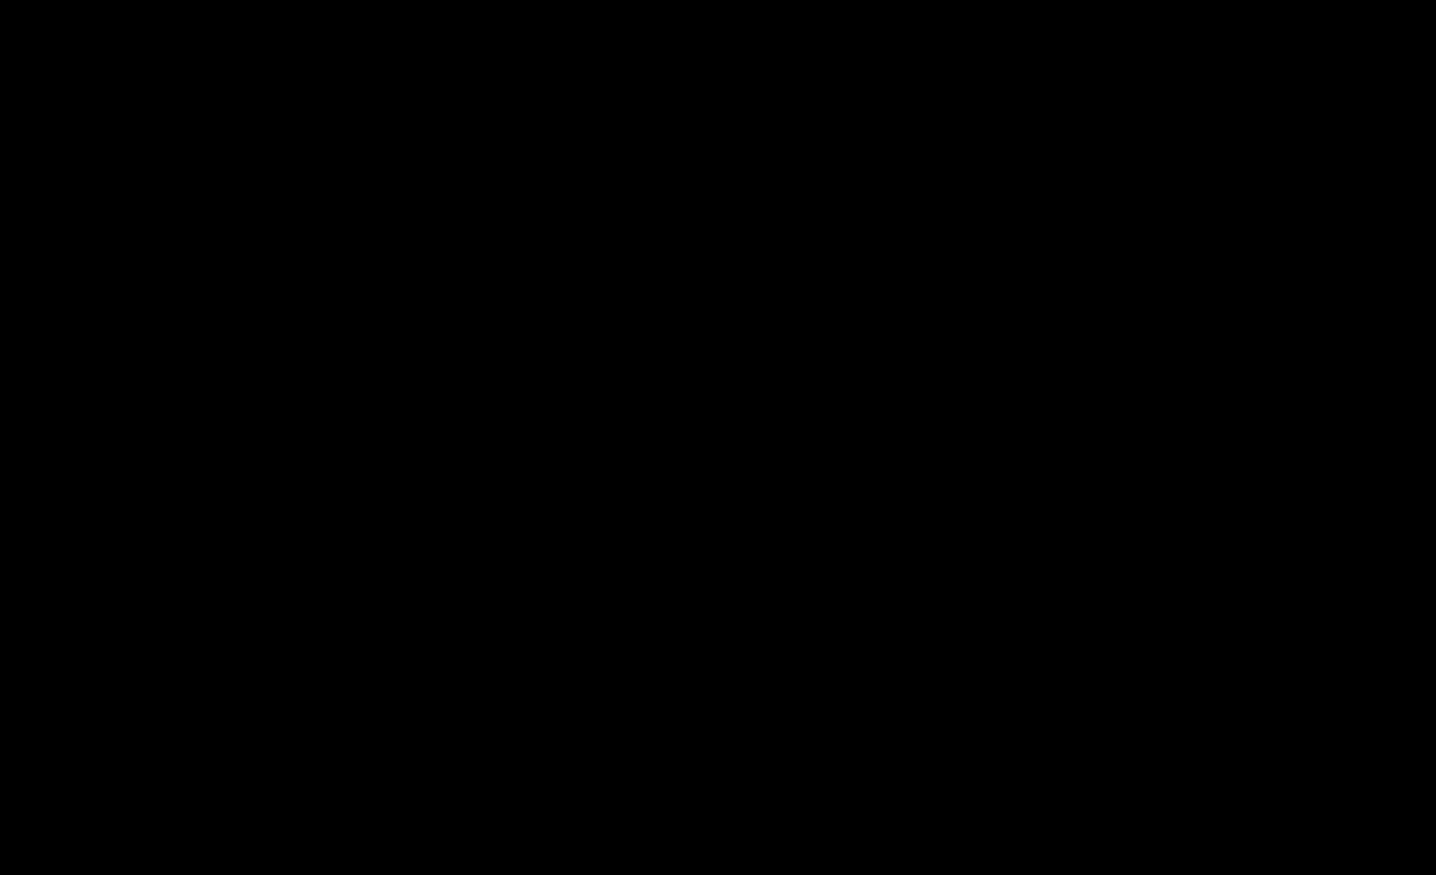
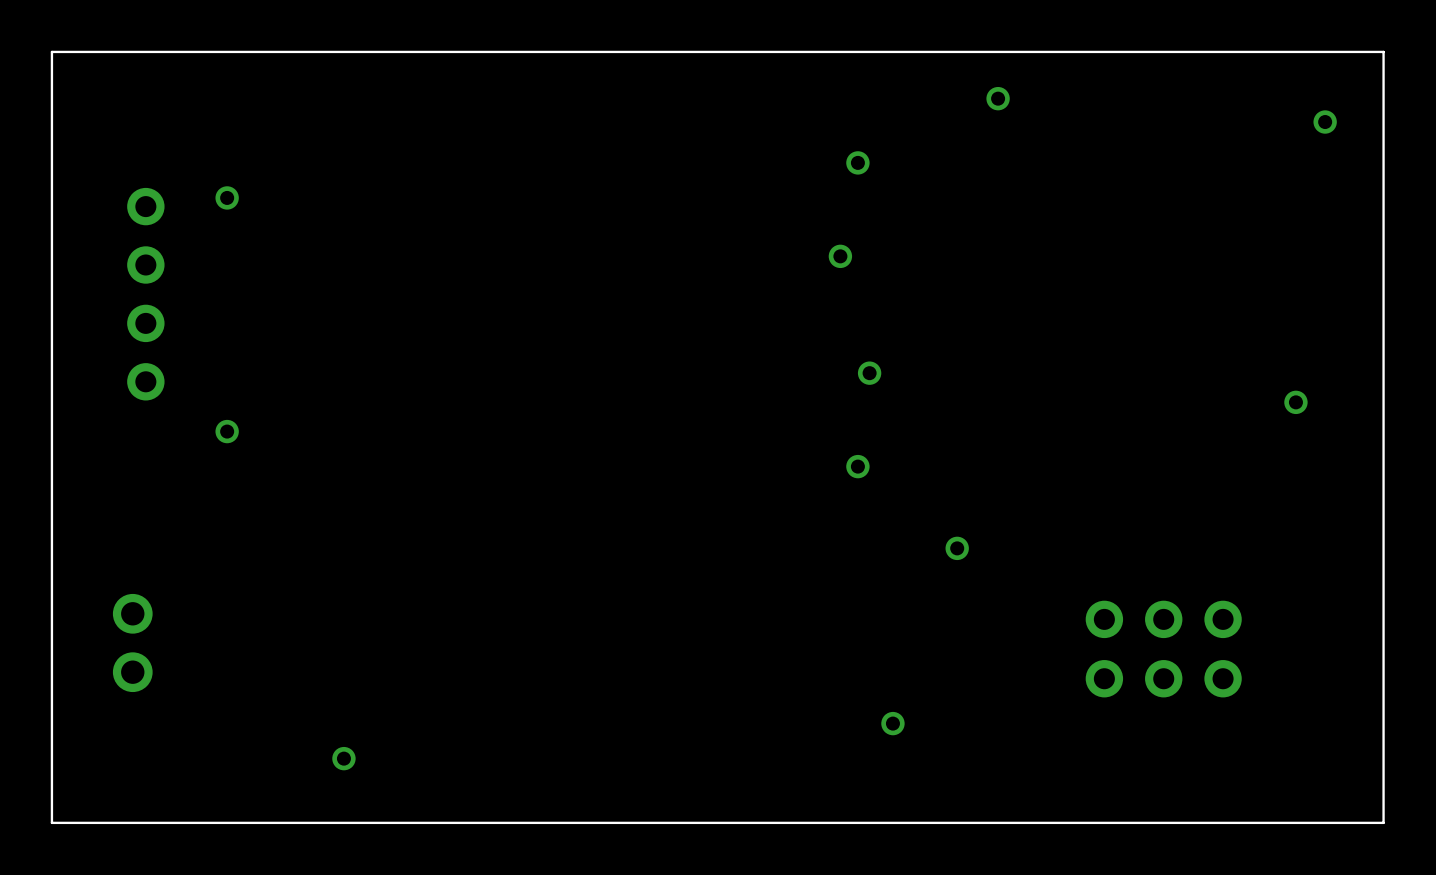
board edge: none -> (1383, 51) (51, 51) (51, 822) (1383, 822) (1383, 51)
via: none -> (998, 98)
via: none -> (1325, 122)
via: none -> (857, 162)
via: none -> (227, 197)
via: none -> (840, 256)
part: none -> (145, 294)
via: none -> (869, 373)
via: none -> (1295, 402)
via: none -> (227, 431)
via: none -> (857, 466)
via: none -> (957, 548)
part: none -> (132, 642)
part: none -> (1163, 649)
via: none -> (892, 723)
via: none -> (343, 758)

